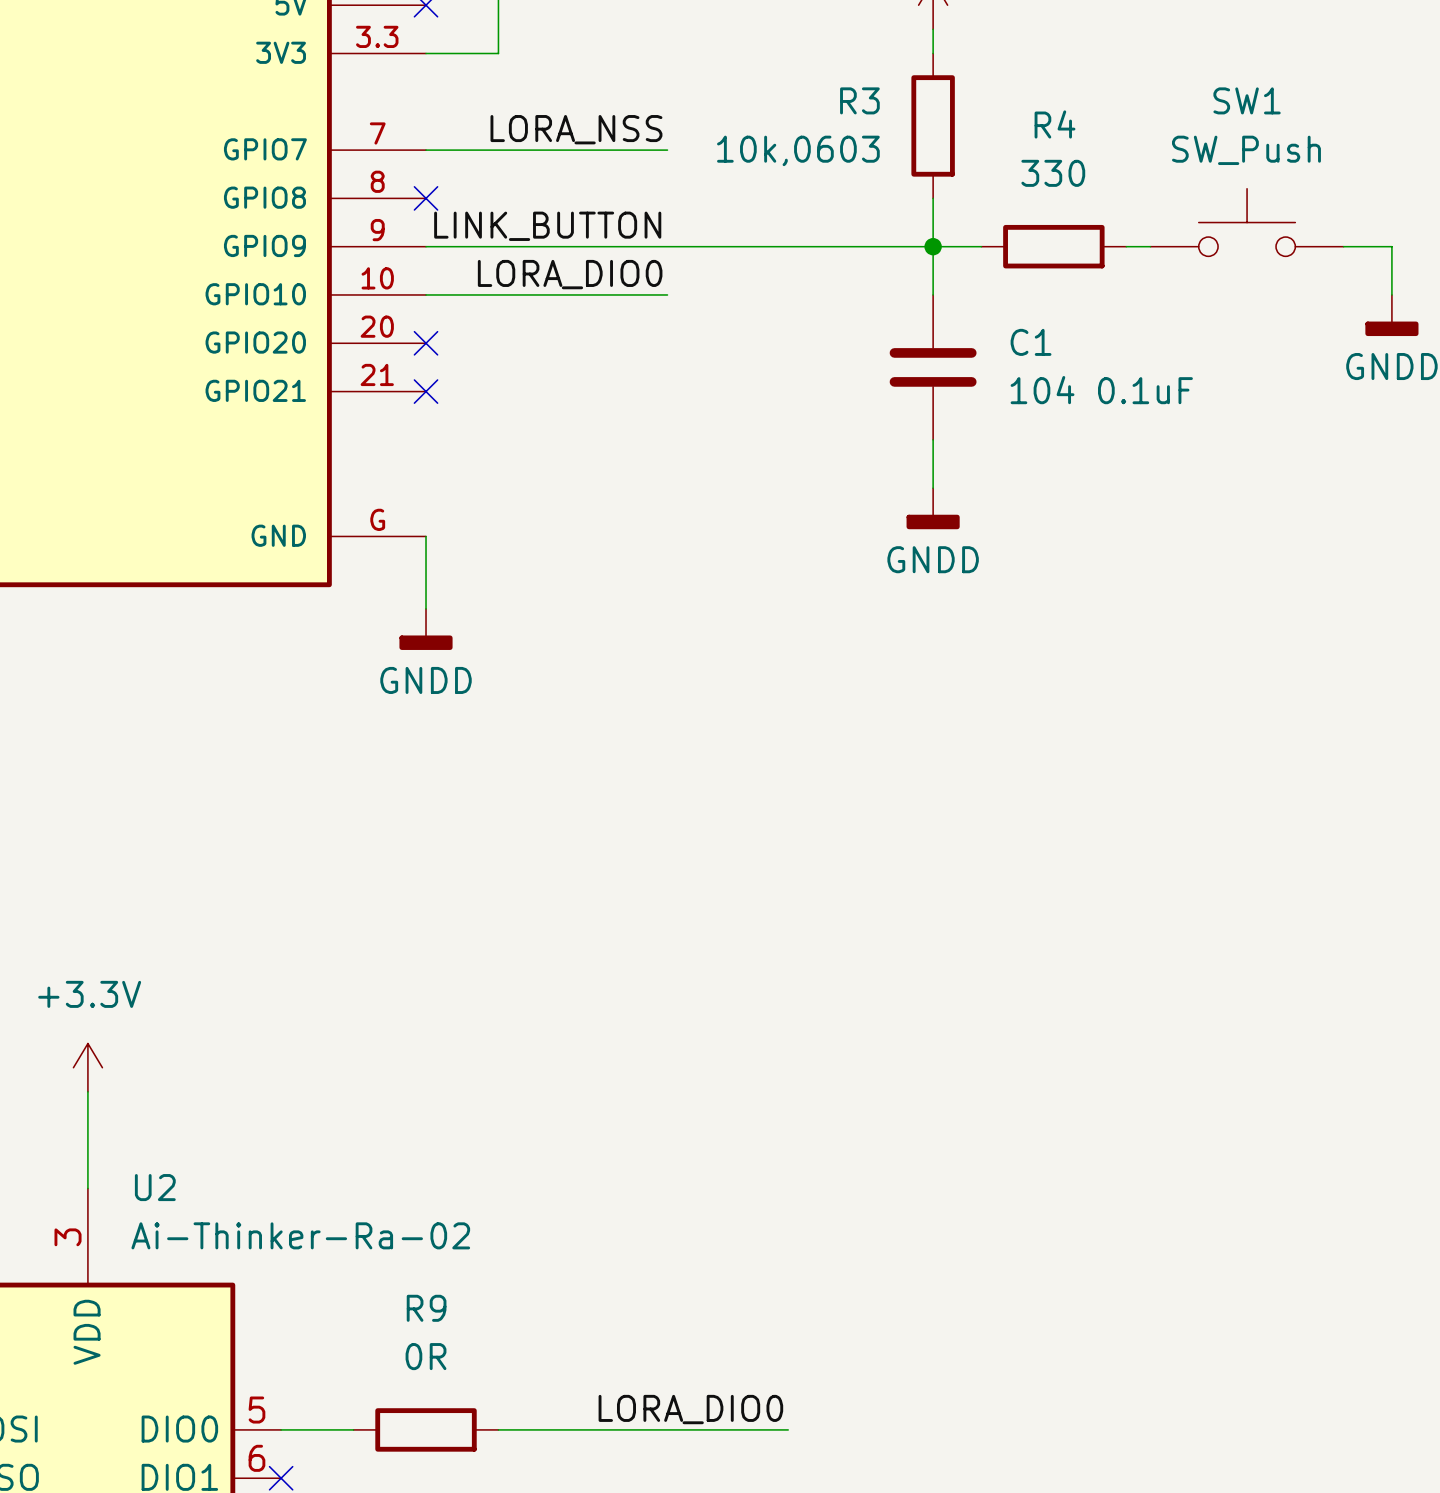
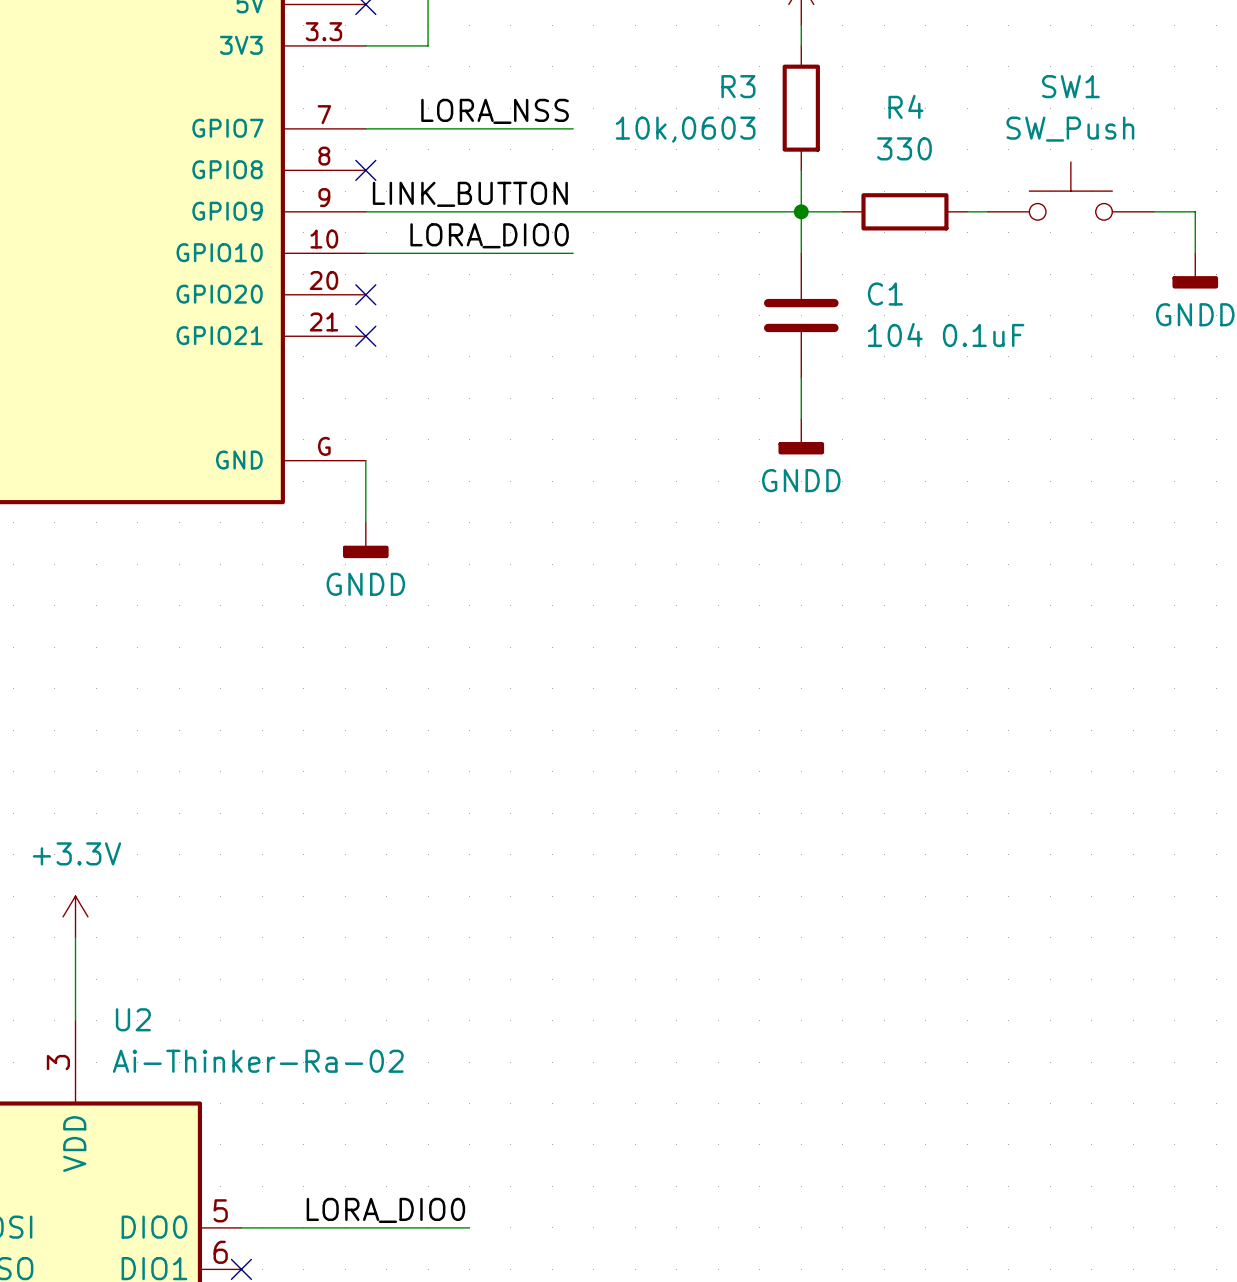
label position: LORA_DIO0 (690, 1409) -> LORA_DIO0 (385, 1210)
wire: none -> (303, 1227) (428, 1227)
R9: 0R (426, 1429) -> none
wire: (546, 1429) (788, 1429) -> none

